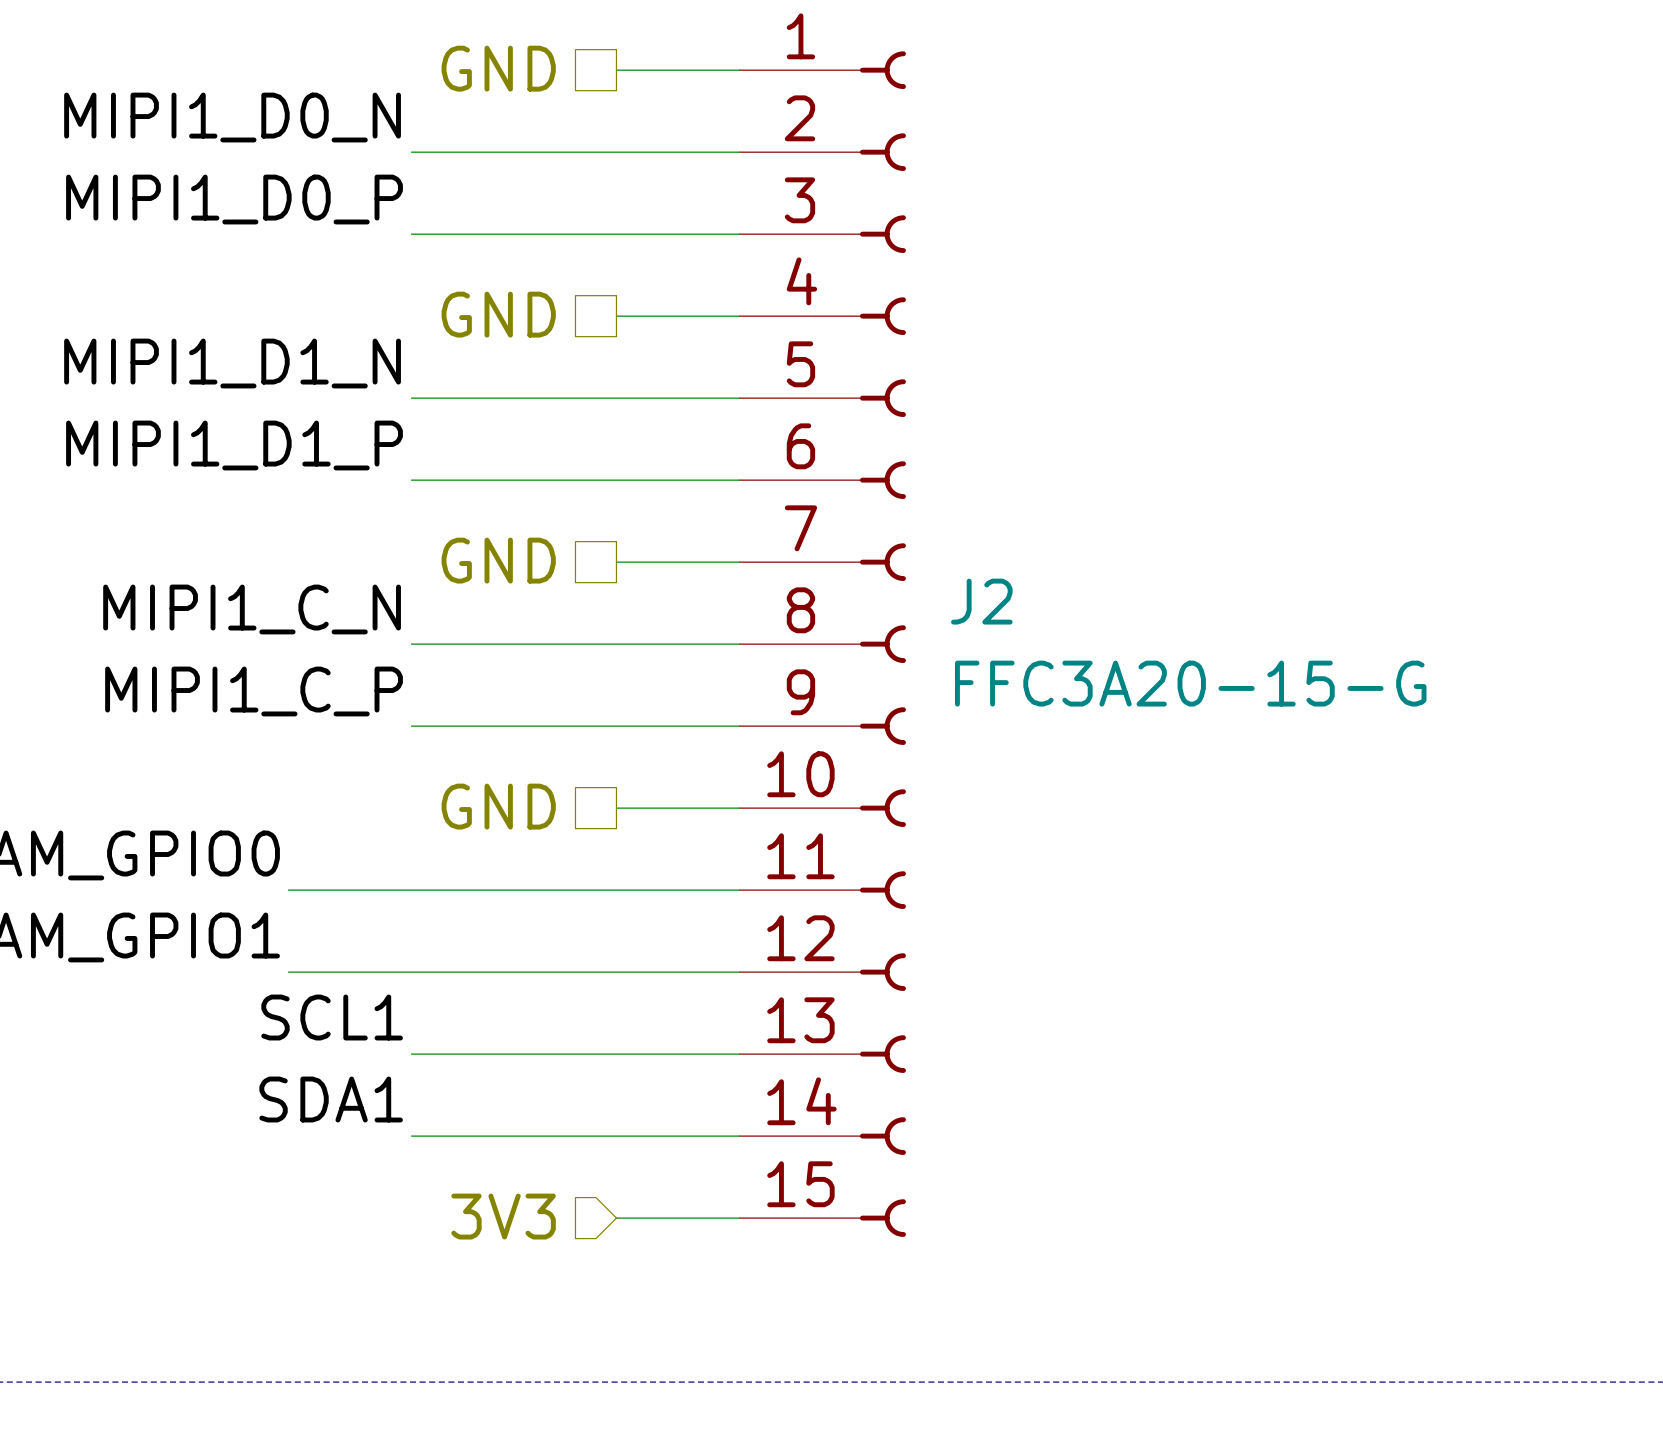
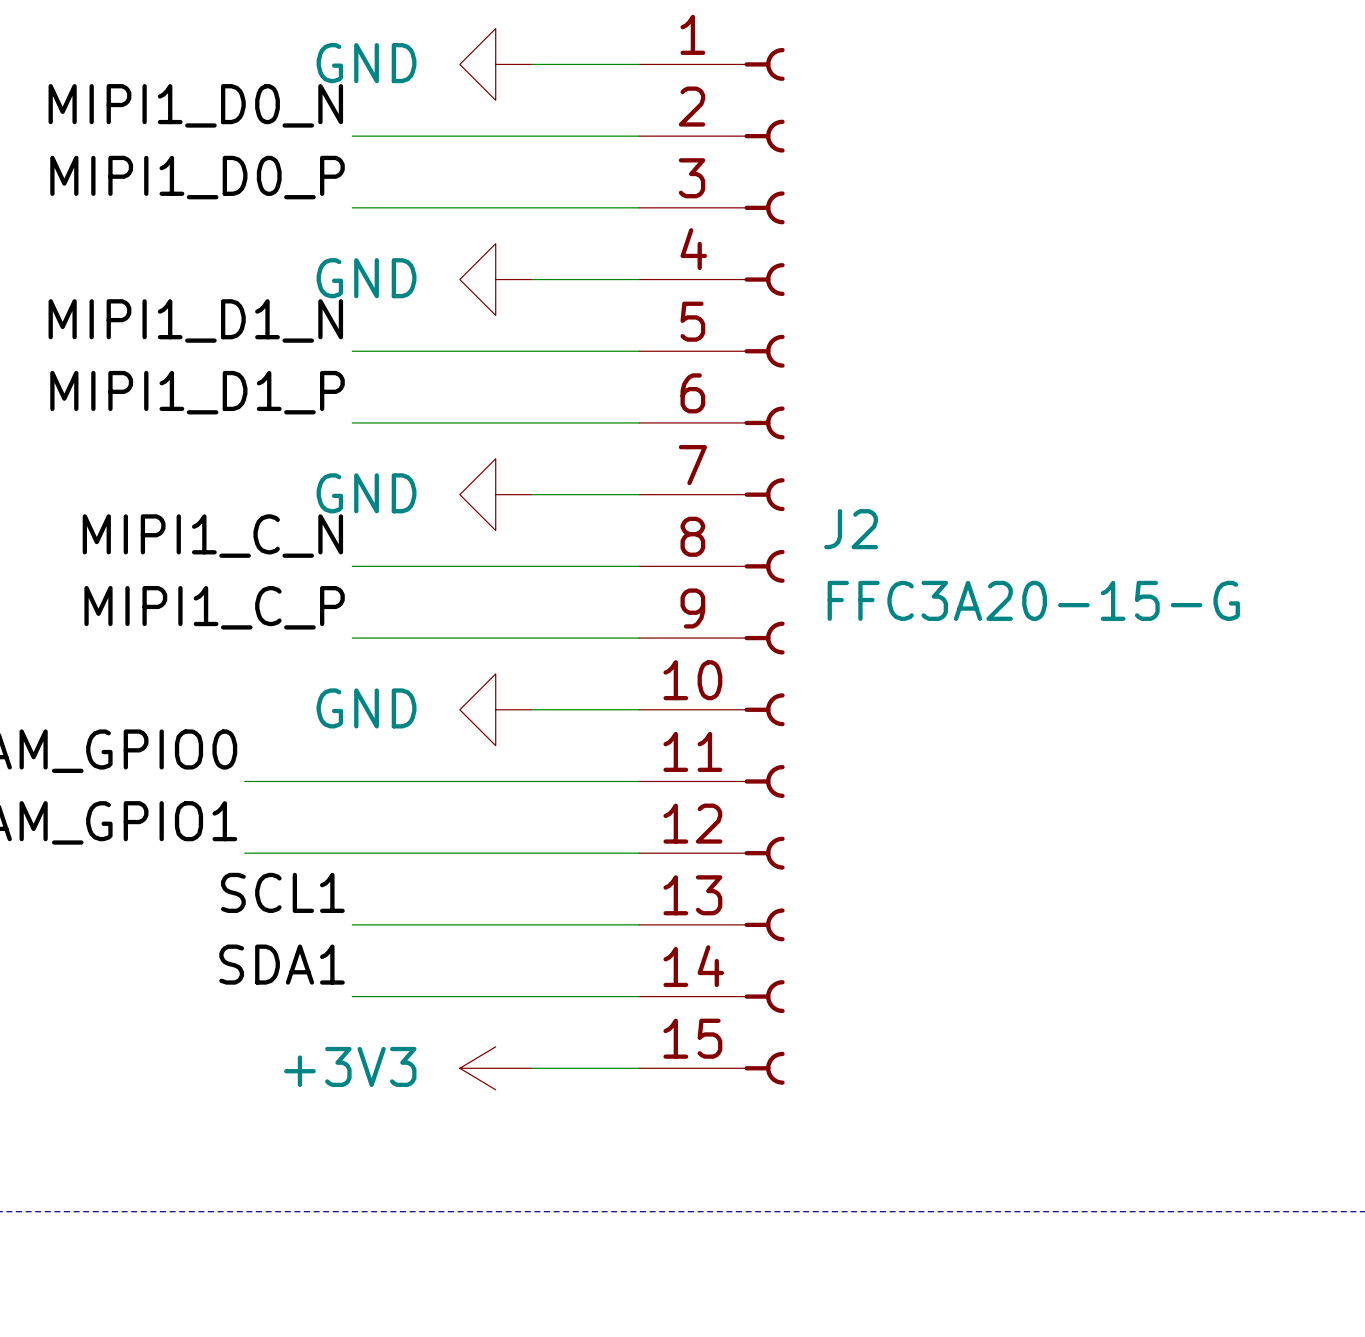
hierarchical label: GND (498, 68) -> none
power symbol: none -> GND (495, 64)
hierarchical label: GND (498, 314) -> none
power symbol: none -> GND (495, 279)
hierarchical label: GND (498, 560) -> none
power symbol: none -> GND (495, 494)
hierarchical label: GND (498, 806) -> none
power symbol: none -> GND (495, 709)
hierarchical label: 3V3 (503, 1216) -> none
power symbol: none -> +3V3 (495, 1068)

